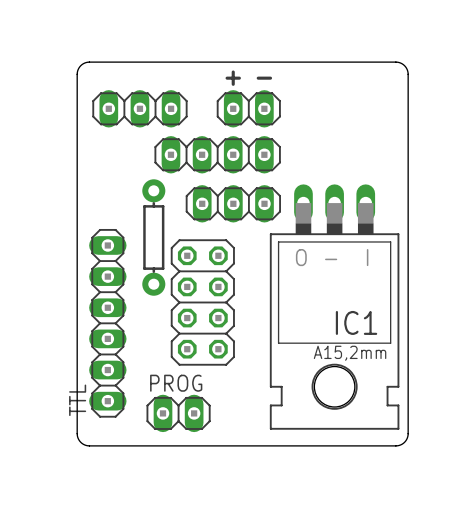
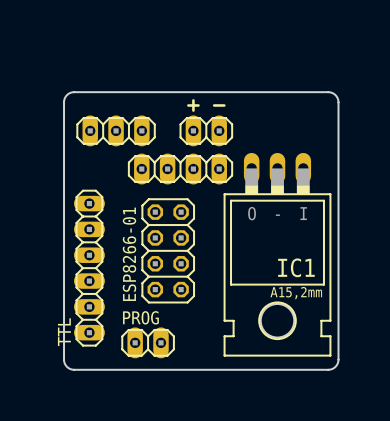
line: (233, 72) (233, 84) -> (193, 100) (193, 110)
line: (227, 78) (239, 78) -> (188, 105) (198, 105)
line: (258, 78) (270, 78) -> (214, 105) (224, 105)
part position: (139, 108) -> (116, 130)
part position: (248, 108) -> (206, 130)
board edge: (77, 123) (77, 71) (81, 64) (89, 62) (397, 62) (404, 65) (408, 72) (408, 123) -> (64, 102) (66, 95) (74, 92) (328, 92) (335, 95) (338, 102)
part position: (217, 154) -> (180, 169)
part: (233, 203) -> none
part: (153, 237) -> none
ESP8266-01 name: none -> ESP8266-01 (129, 254)

